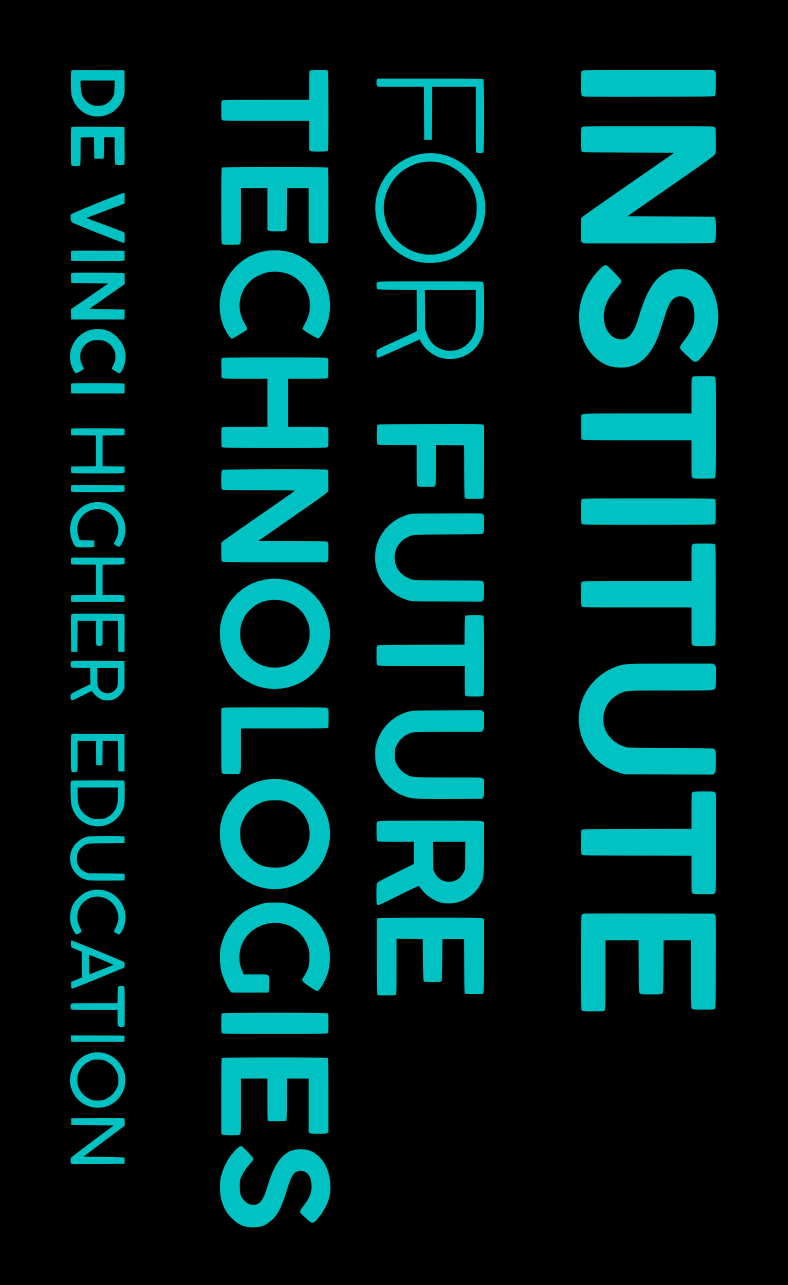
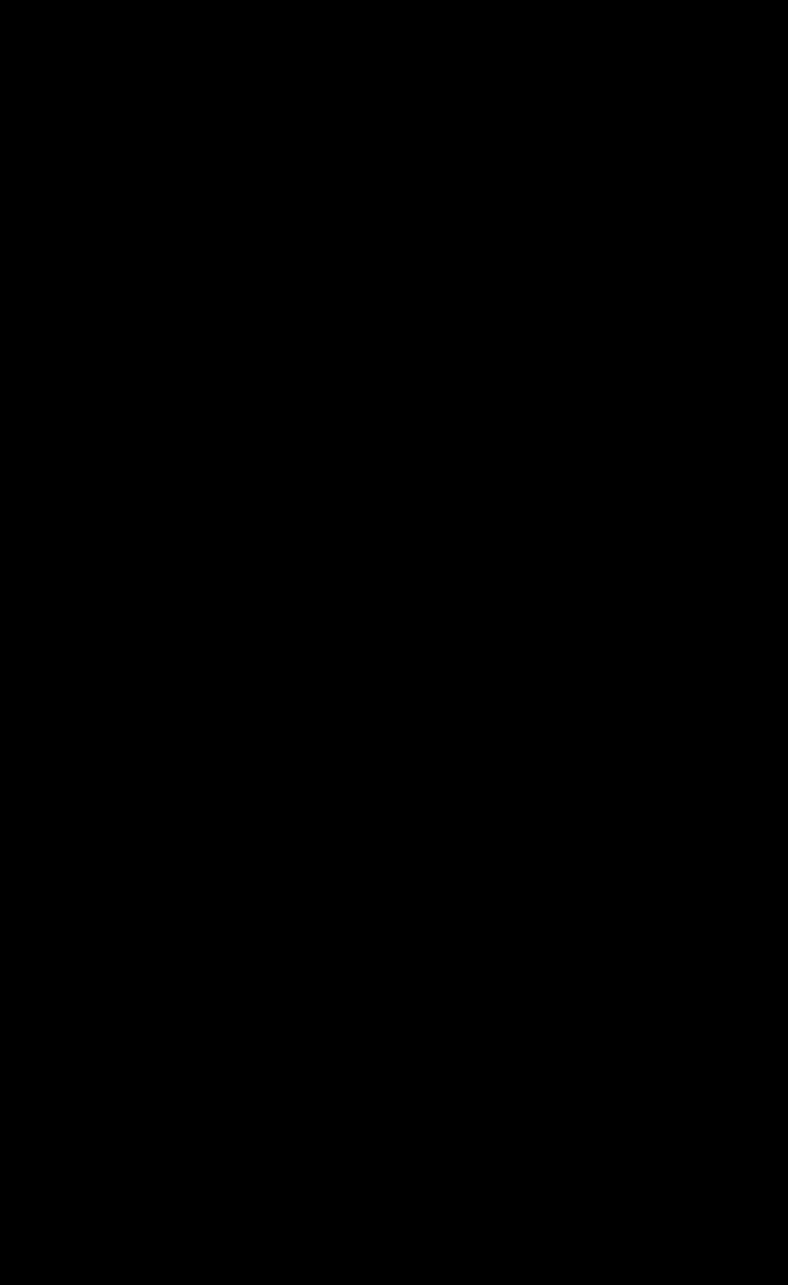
drawing: [69, 69, 719, 1228] -> none

